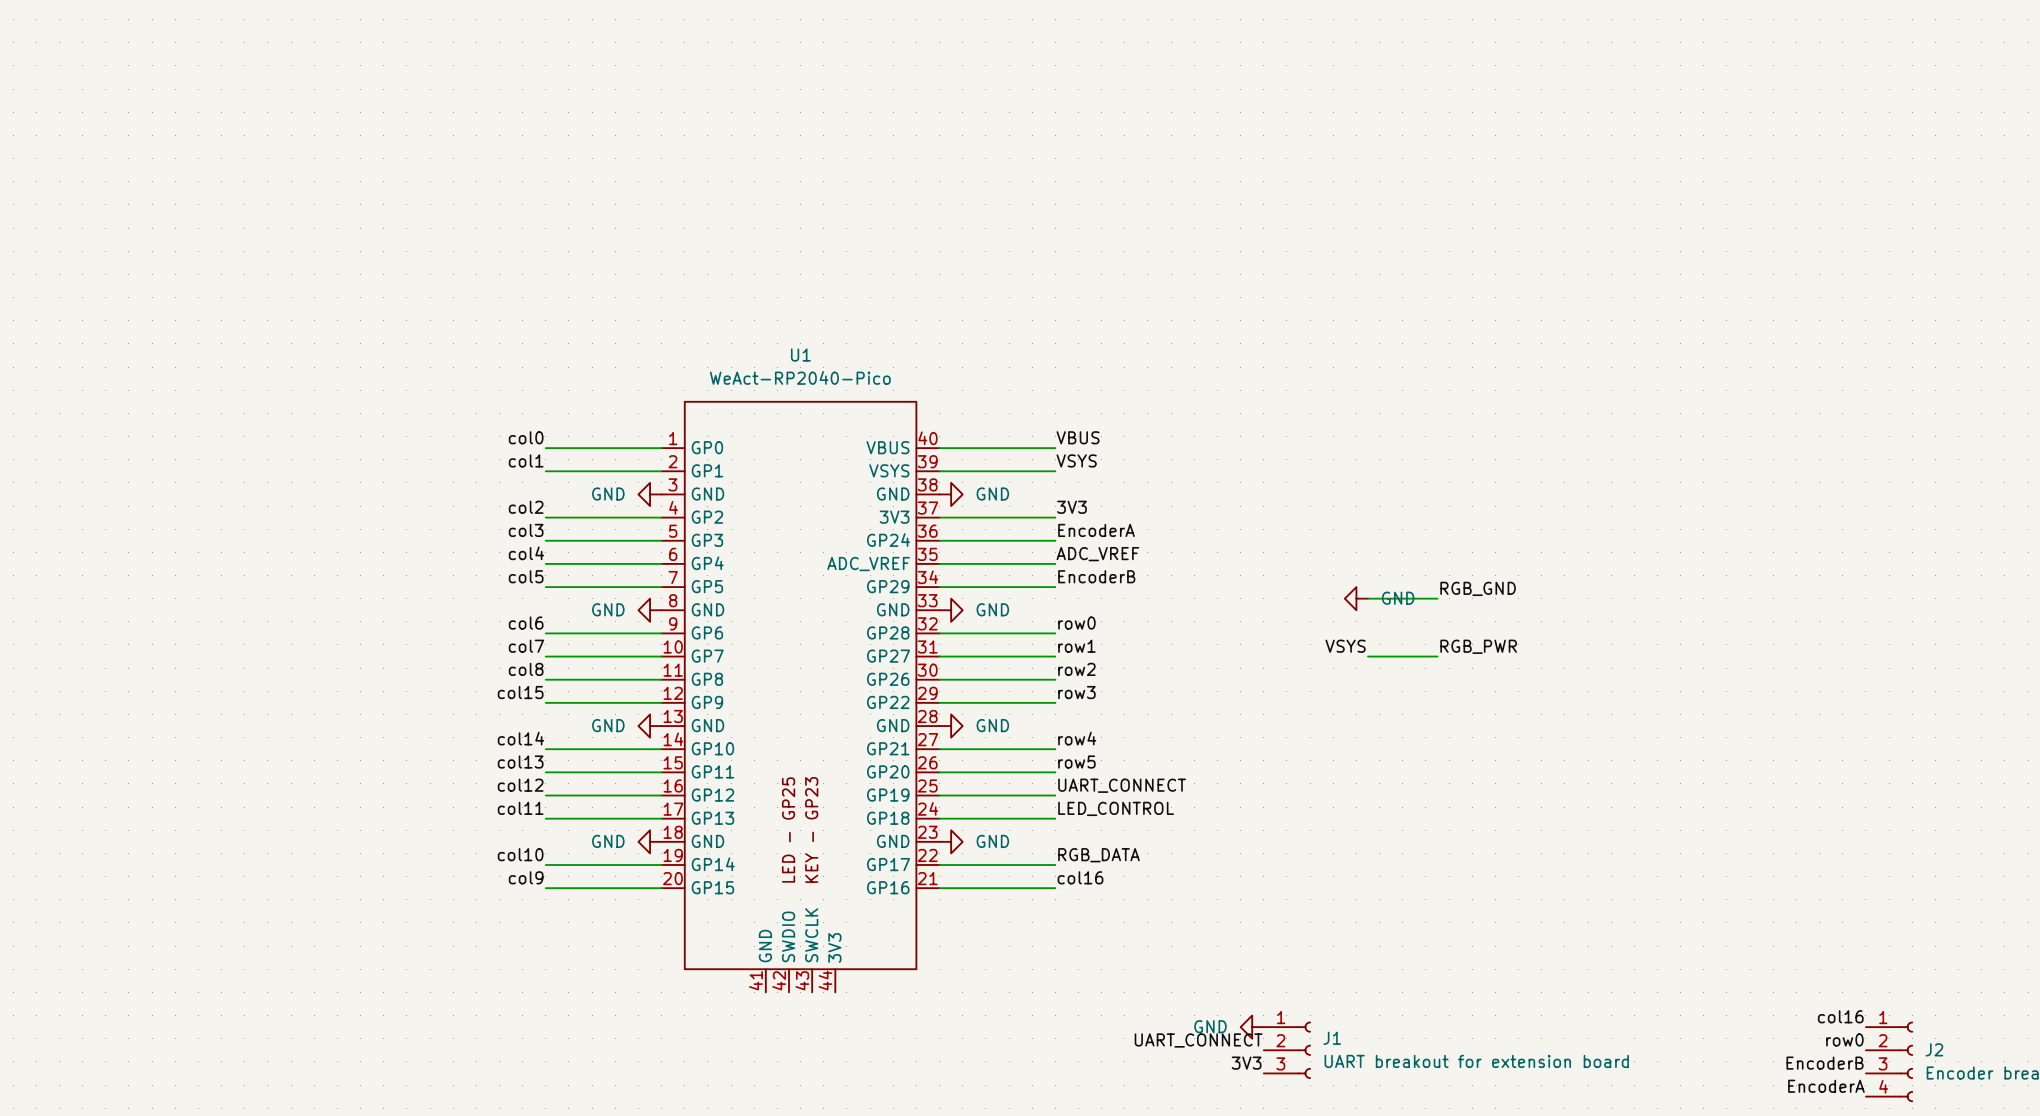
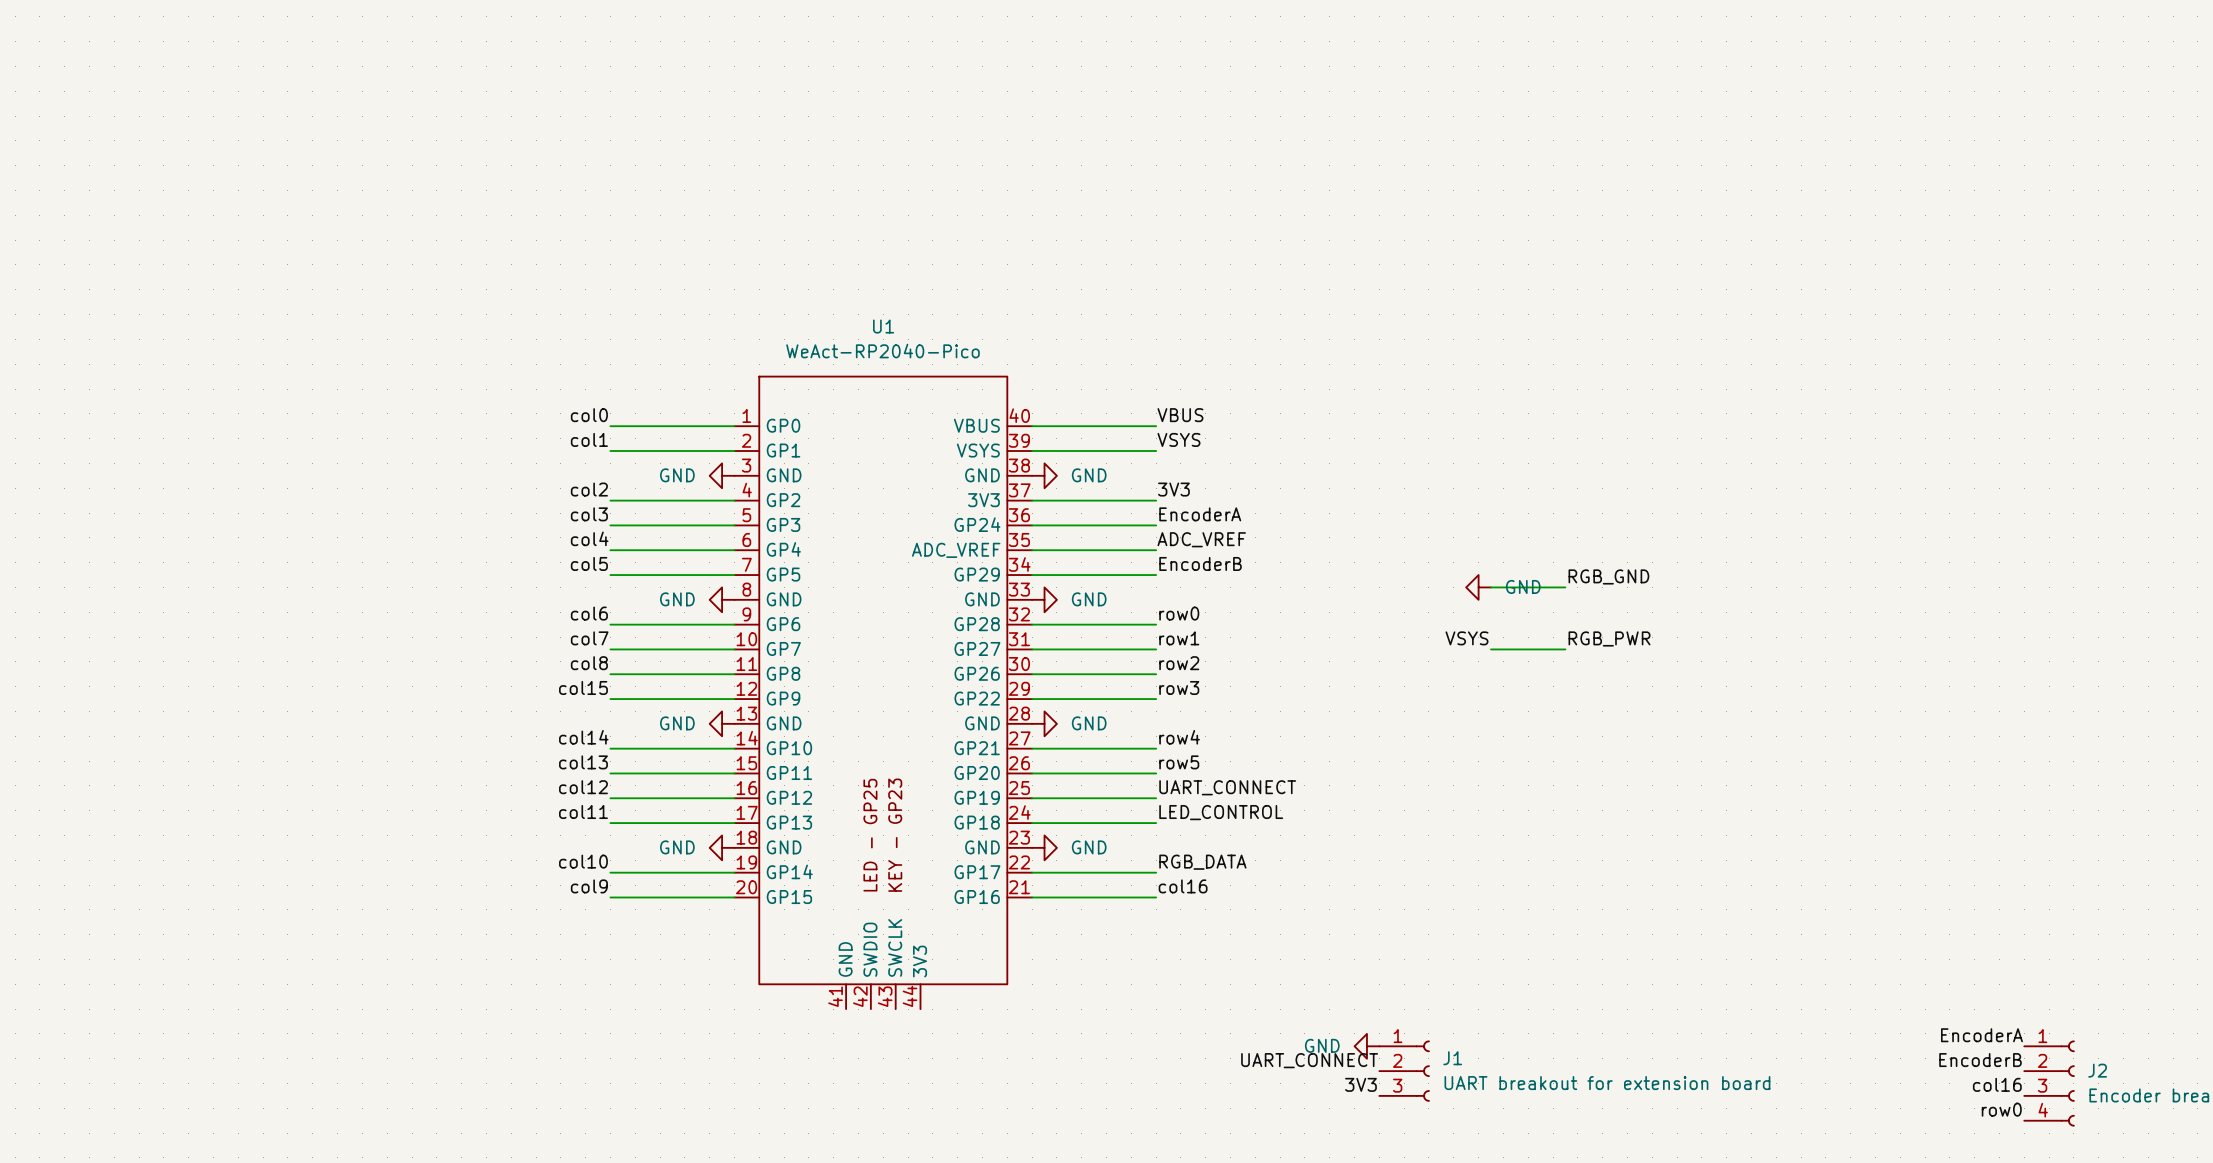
label: col16 (1840, 1016) -> EncoderA (1981, 1035)
label: row0 (1844, 1039) -> EncoderB (1980, 1060)
label: EncoderB (1825, 1063) -> col16 (1997, 1084)
label: EncoderA (1826, 1086) -> row0 (2001, 1109)

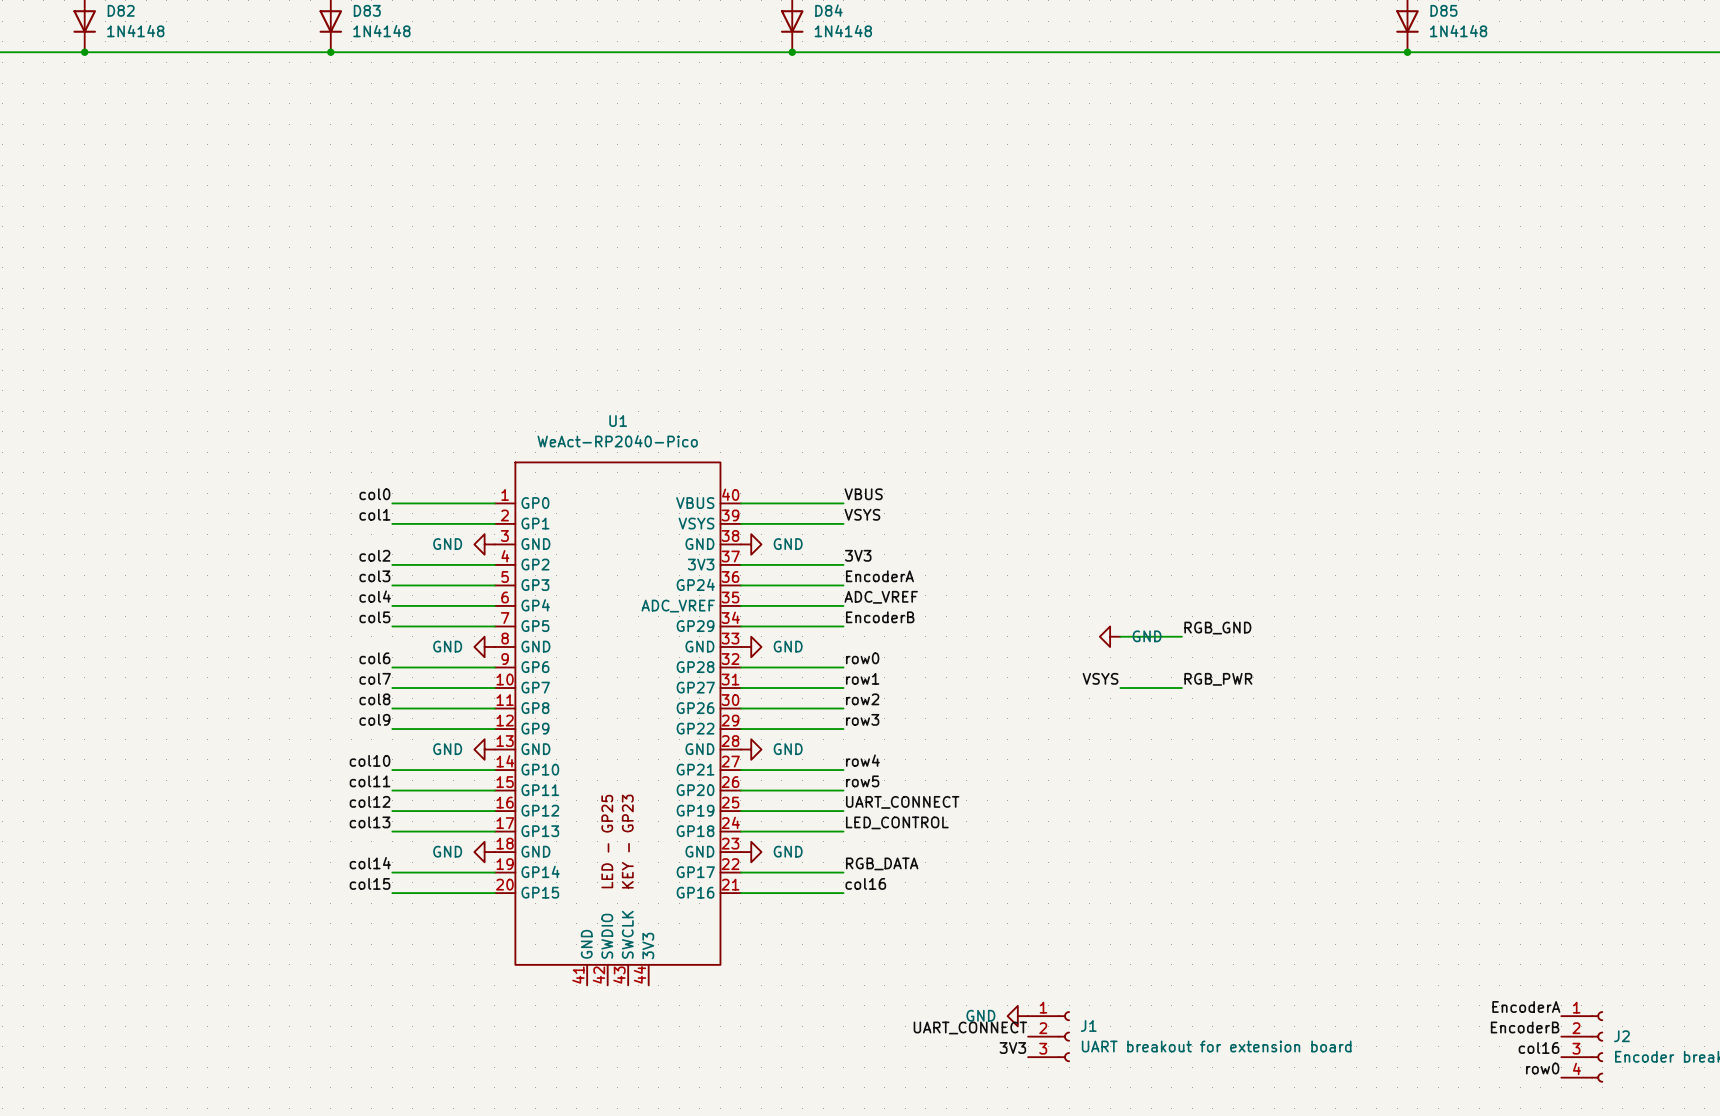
label: col15 (583, 687) -> col9 (374, 719)
label: col14 (583, 737) -> col10 (370, 760)
label: col13 (583, 762) -> col11 (370, 781)
label: col11 (583, 812) -> col13 (370, 822)
label: col10 (583, 861) -> col14 (370, 863)
label: col9 (589, 886) -> col15 (370, 883)

